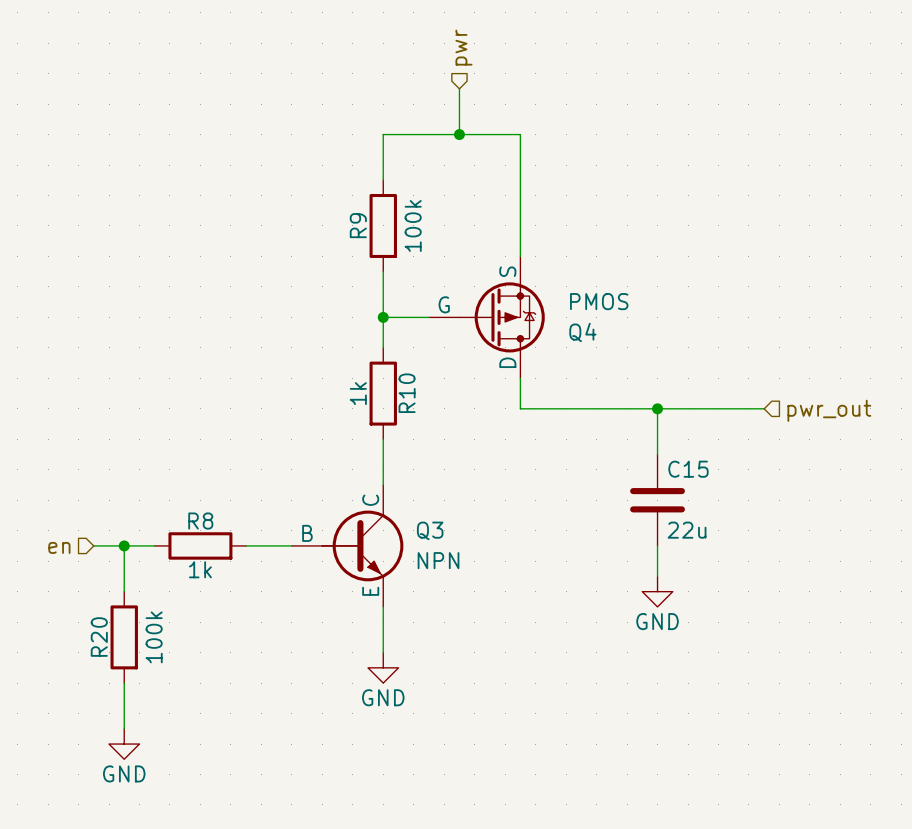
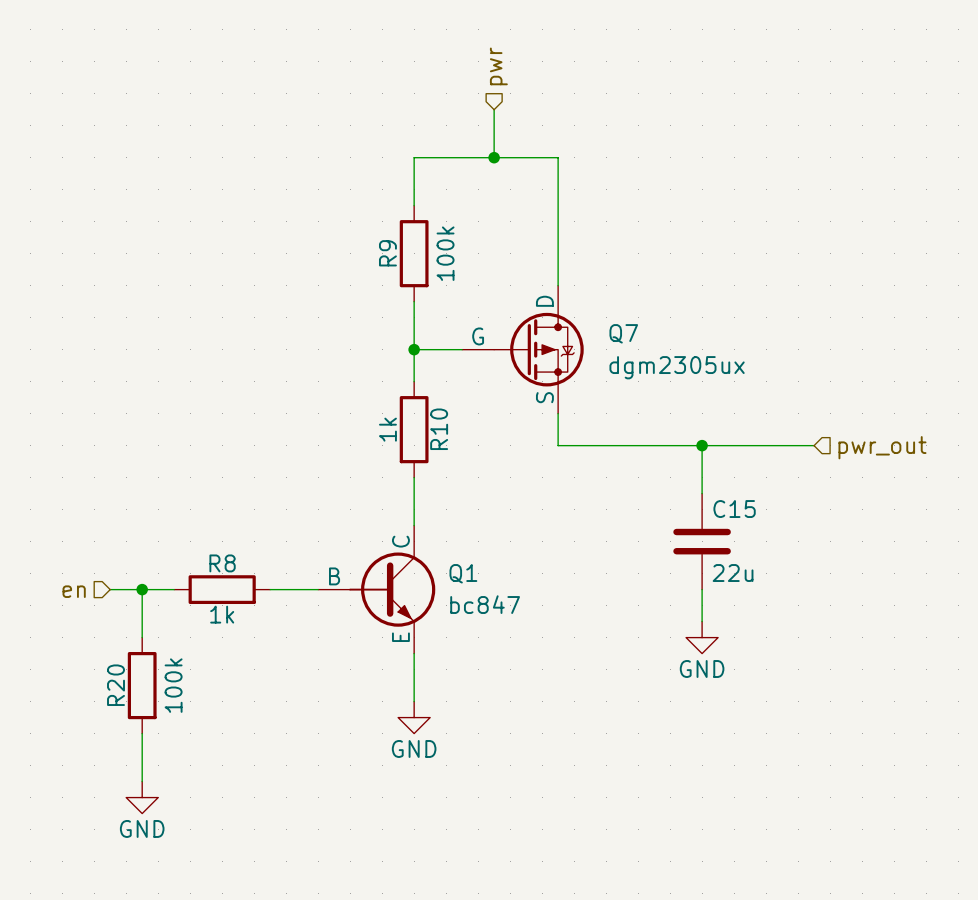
Q4: PMOS (486, 317) -> none
Q7: none -> dgm2305ux (522, 349)
Q3 name: Q3 (430, 530) -> Q1 (463, 573)
Q3 value: NPN (438, 560) -> bc847 (485, 604)

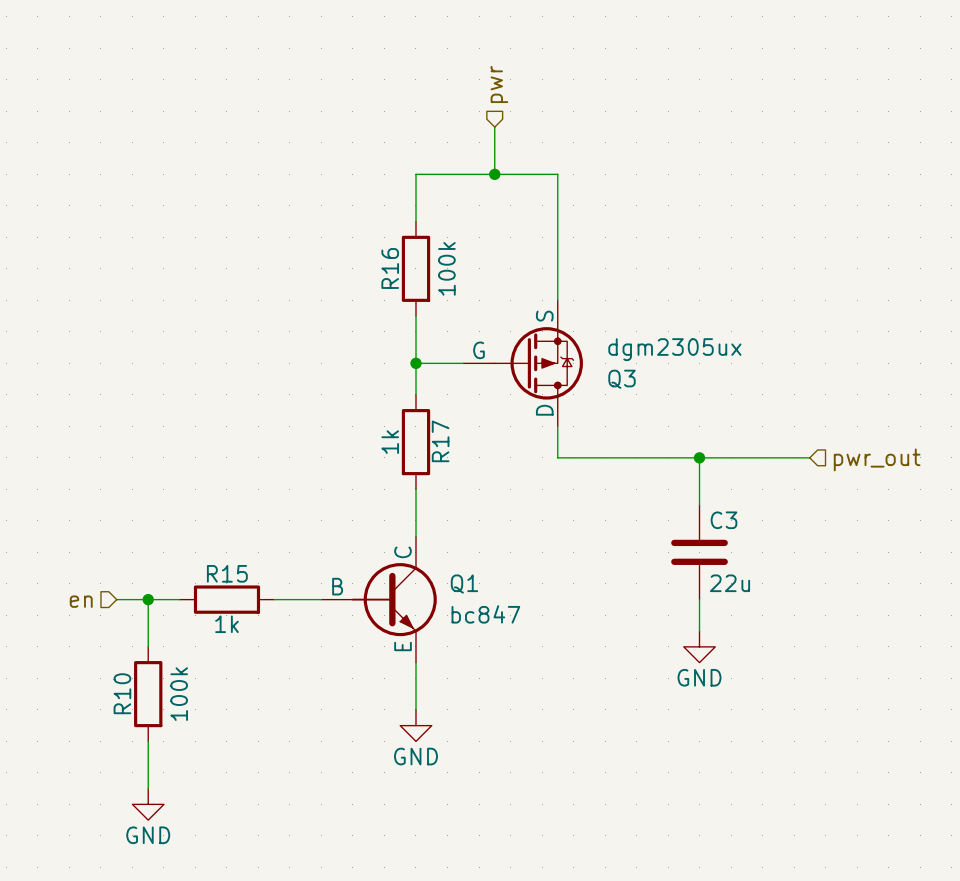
R9 name: R9 (387, 253) -> R16 (390, 268)
Q7: dgm2305ux (522, 349) -> none
Q3: none -> dgm2305ux (523, 363)
R10 name: R10 (439, 429) -> R17 (440, 441)
C15 name: C15 (734, 509) -> C3 (724, 520)
R8 name: R8 (222, 563) -> R15 (227, 573)
R20 name: R20 (116, 685) -> R10 (122, 693)

